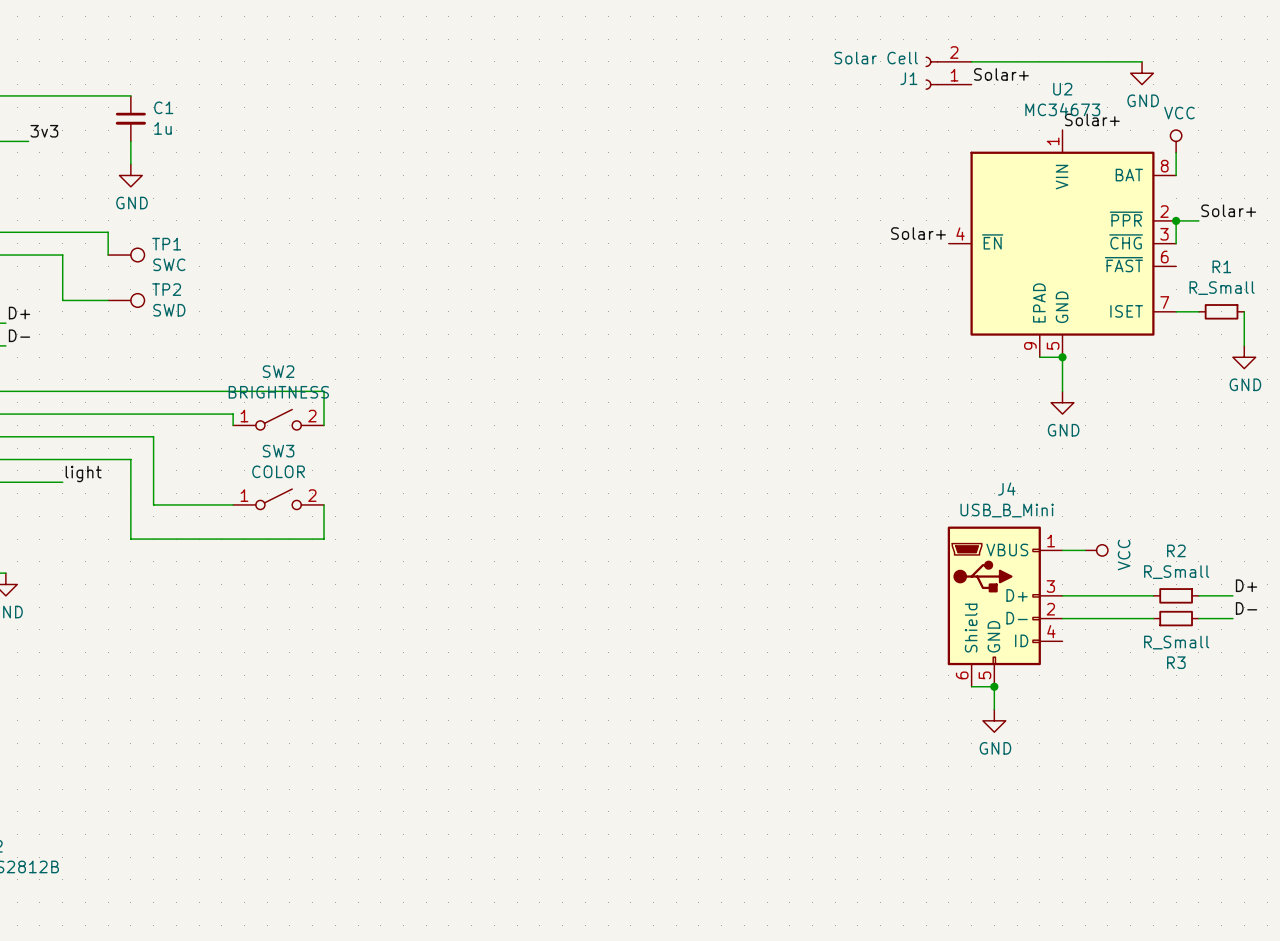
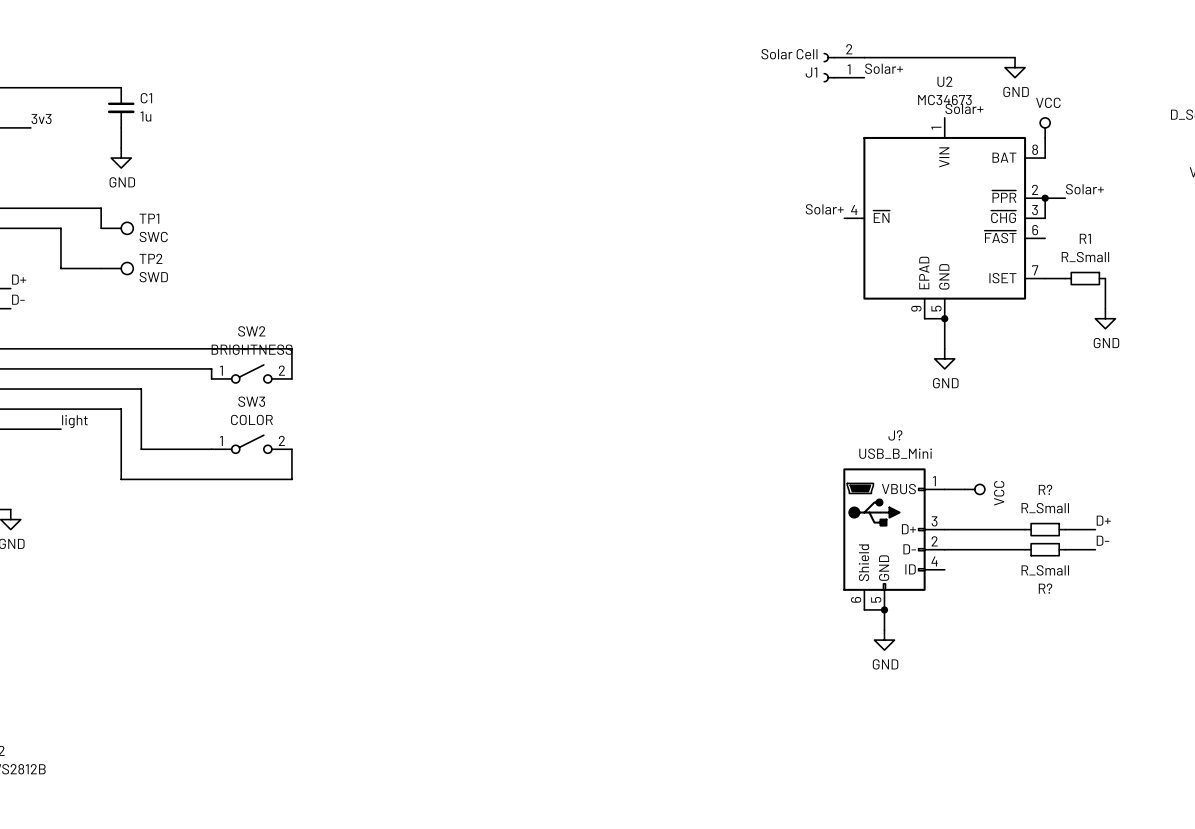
J4 name: J4 (1006, 489) -> J? (895, 435)
R2 name: R2 (1176, 550) -> R? (1045, 489)
R3 name: R3 (1176, 662) -> R? (1045, 588)

